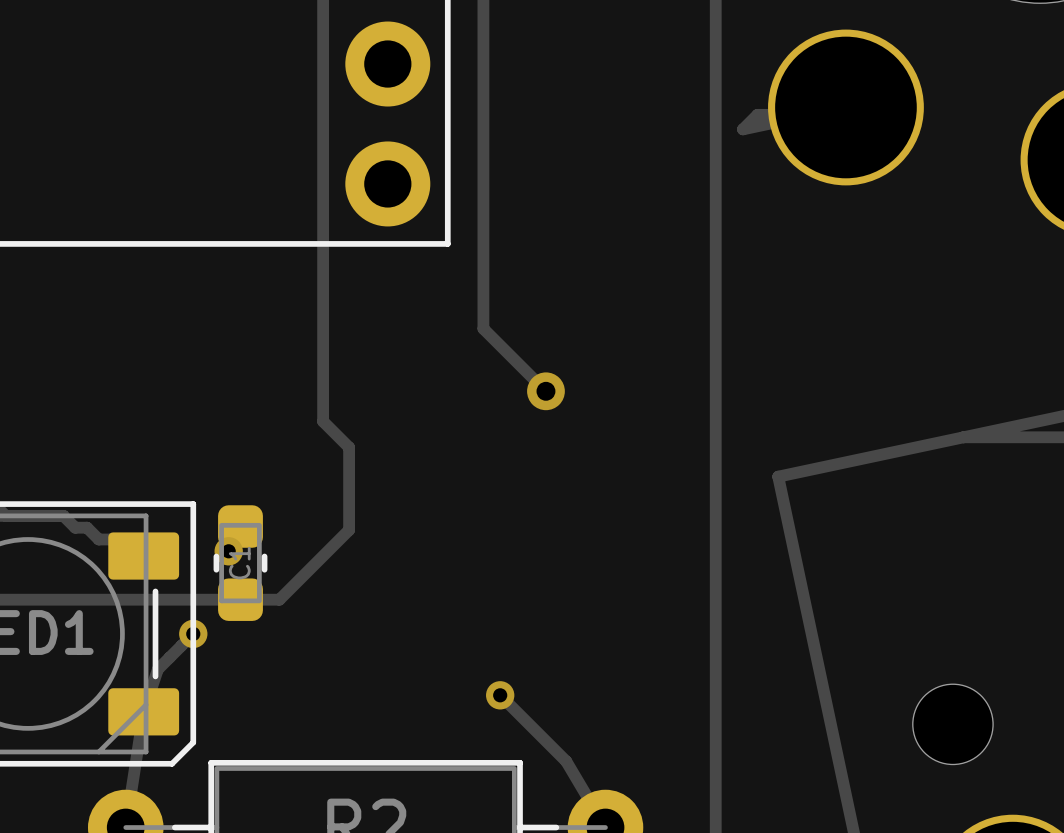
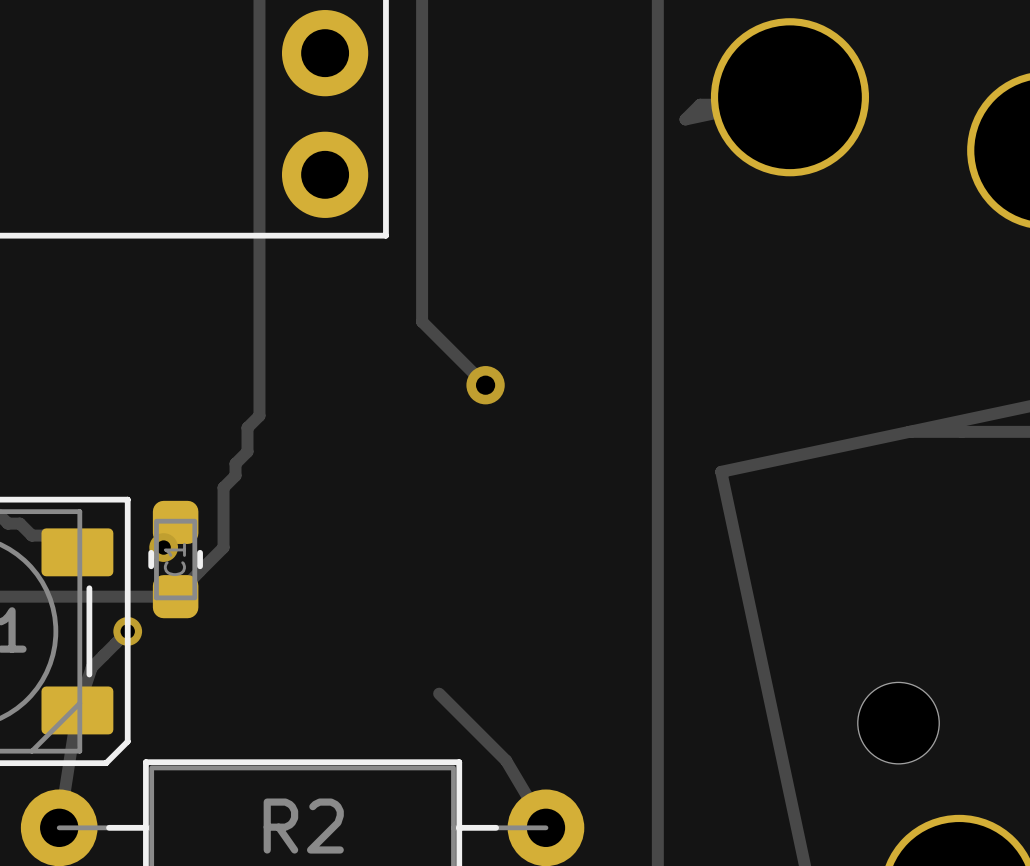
track: (323, 421) (349, 447) (349, 530) (279, 599) (240, 599) -> (259, 415) (247, 427) (247, 451) (235, 463) (235, 475) (223, 487) (223, 547) (175, 596)
via: (500, 695) -> none

